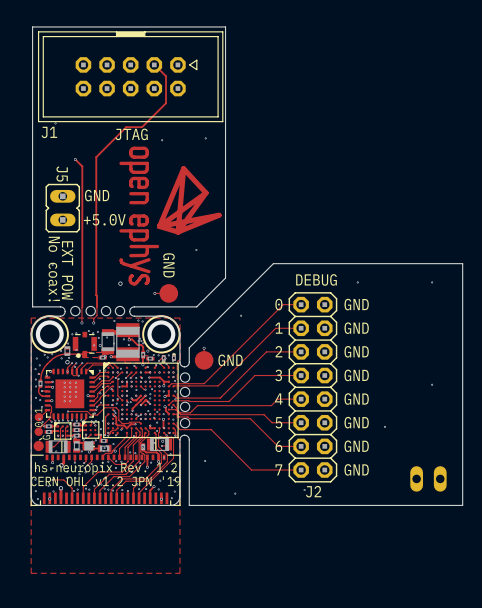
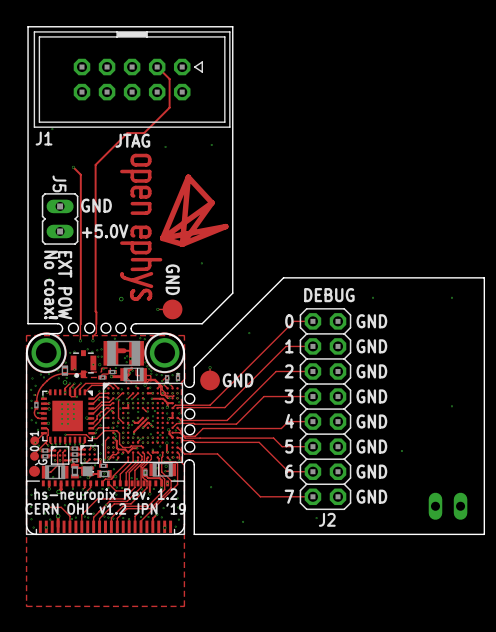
via: none -> (101, 349)
via: none -> (101, 356)
via: (107, 337) -> none
via: none -> (127, 356)
via: (139, 338) -> none
track: (129, 339) (132, 339) (137, 345) (141, 345) (143, 352) -> none
via: (138, 340) -> none
via: (141, 340) -> none
part: (107, 341) -> none
part rotation: 0° (127, 342) -> 90° clockwise (123, 353)
via: (114, 343) -> none
via: none -> (126, 362)
via: (128, 345) -> none
via: none -> (147, 366)
via: none -> (115, 368)
via: none -> (103, 369)
via: none -> (149, 368)
via: none -> (132, 370)
via: (147, 351) -> none
via: none -> (151, 370)
part: none -> (112, 372)
via: none -> (115, 372)
via: none -> (130, 373)
track: none -> (123, 374) (131, 381) (154, 380) (160, 386) (160, 394) (169, 398)
part: none -> (133, 374)
part: (143, 354) -> none
track: none -> (146, 374) (143, 374) (144, 379) (155, 379) (162, 386) (162, 389) (167, 396) (174, 395)
via: none -> (151, 373)
via: (105, 356) -> none
part: (150, 358) -> none
via: (156, 364) -> none
via: none -> (169, 398)

